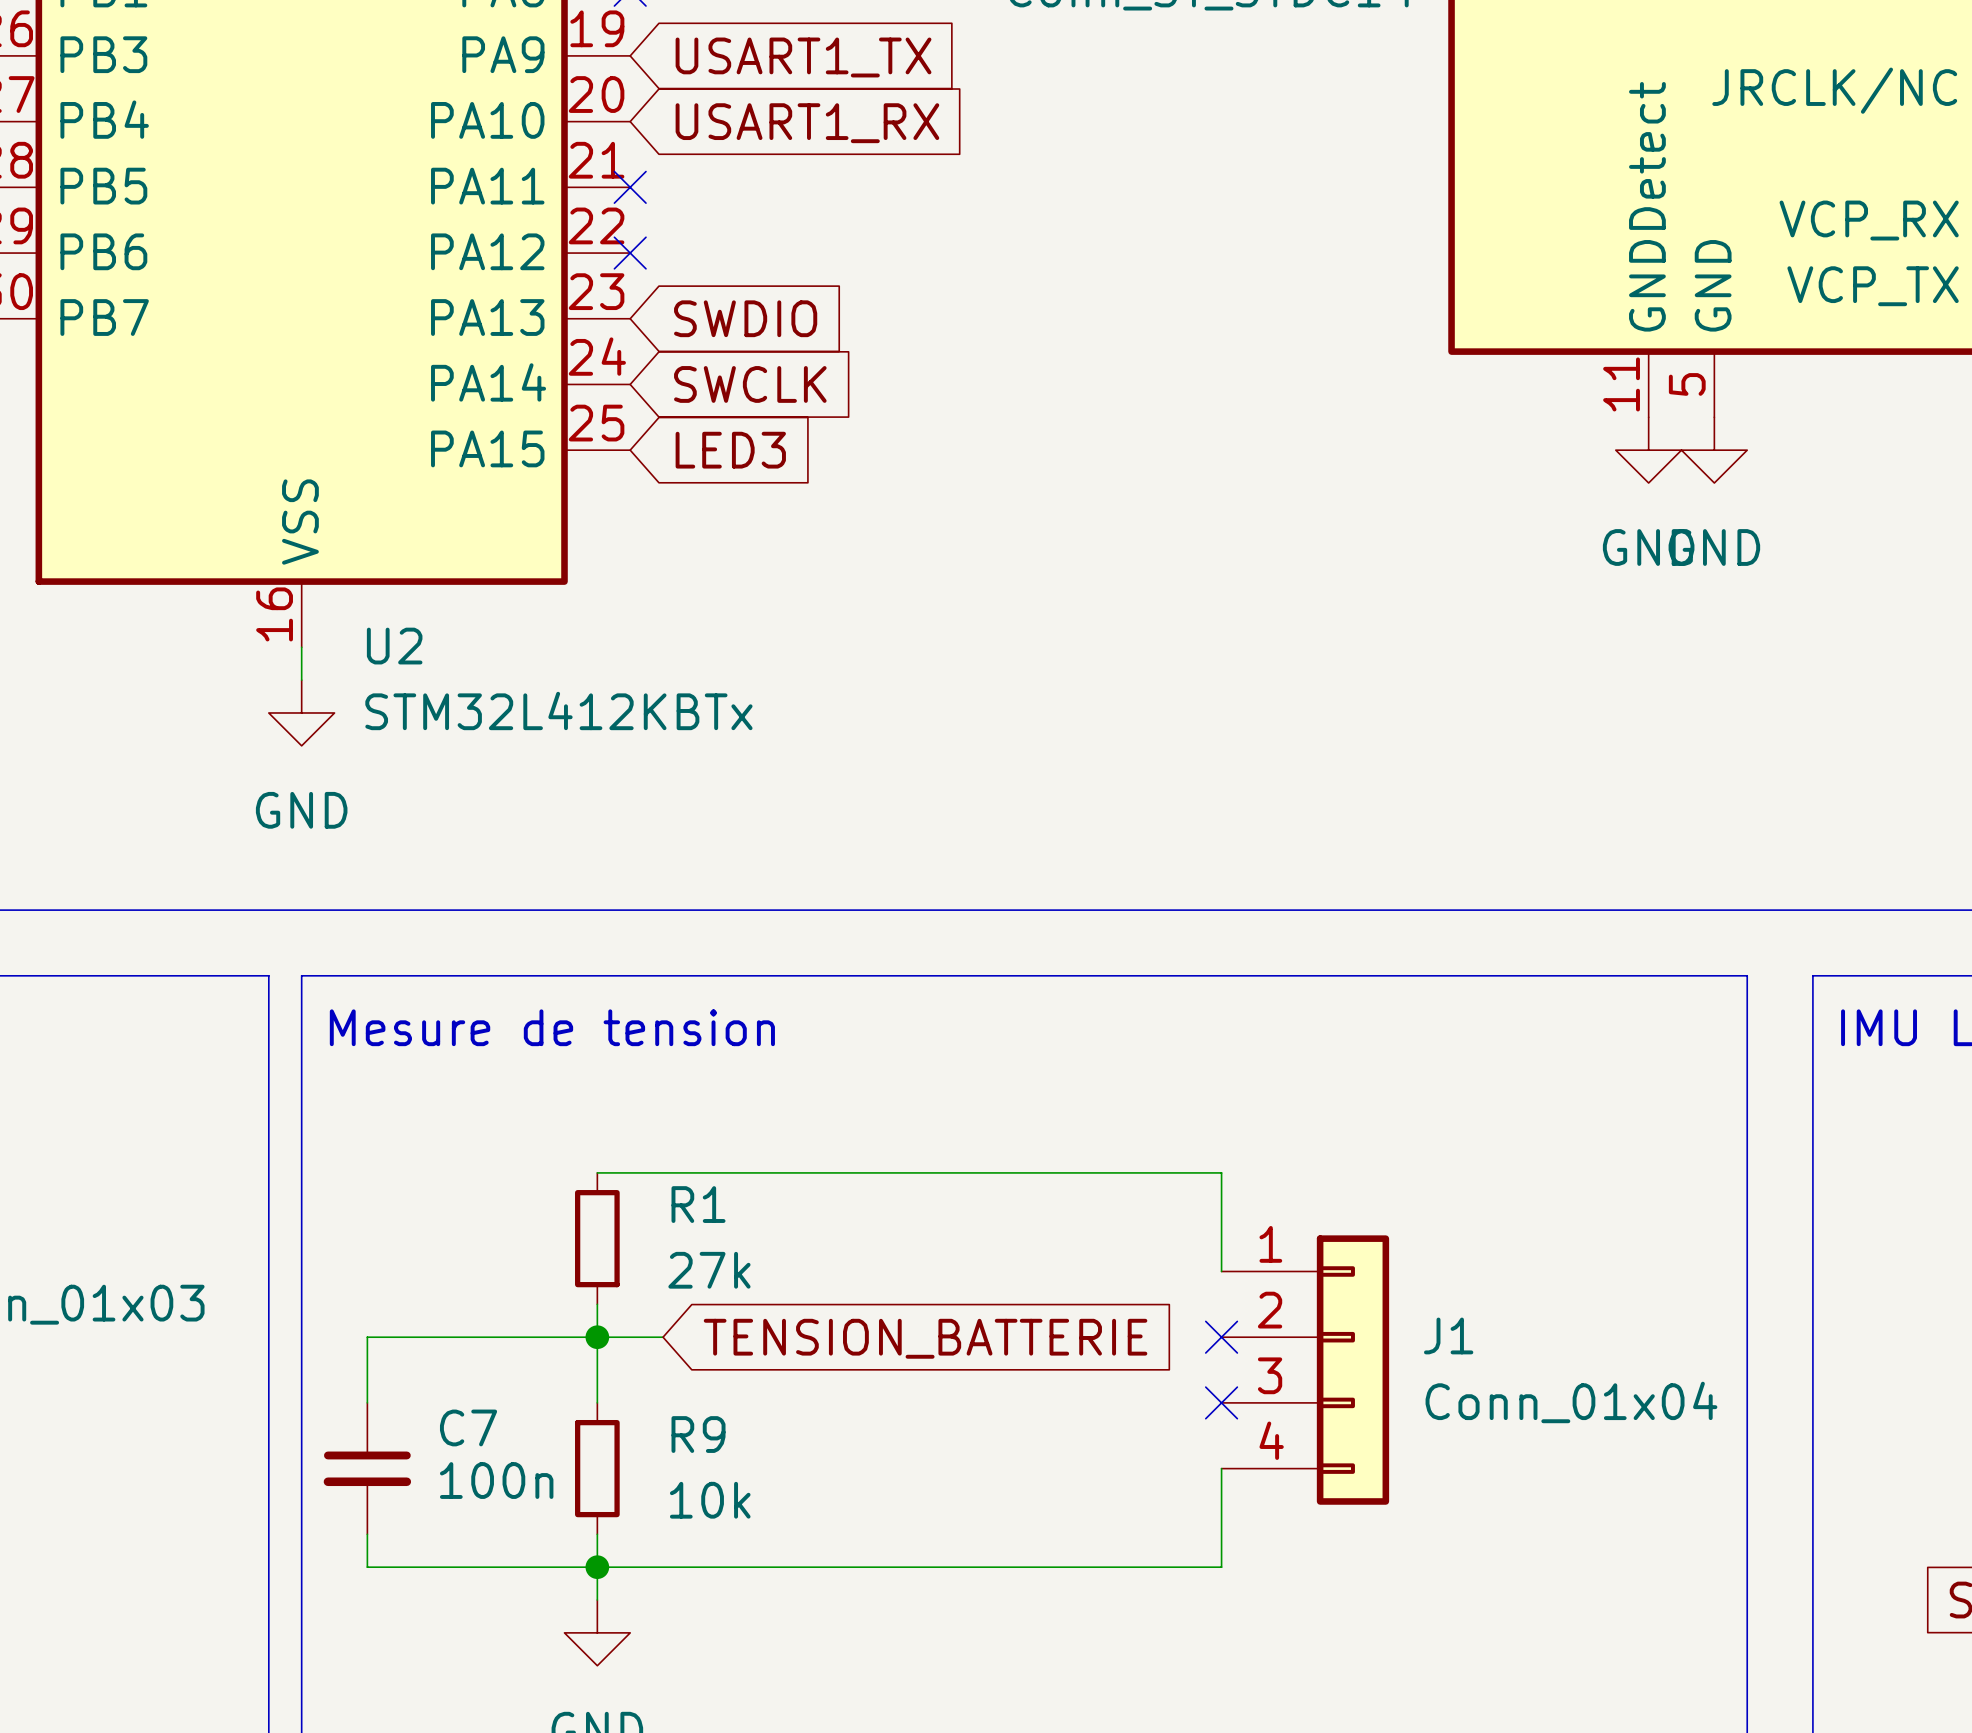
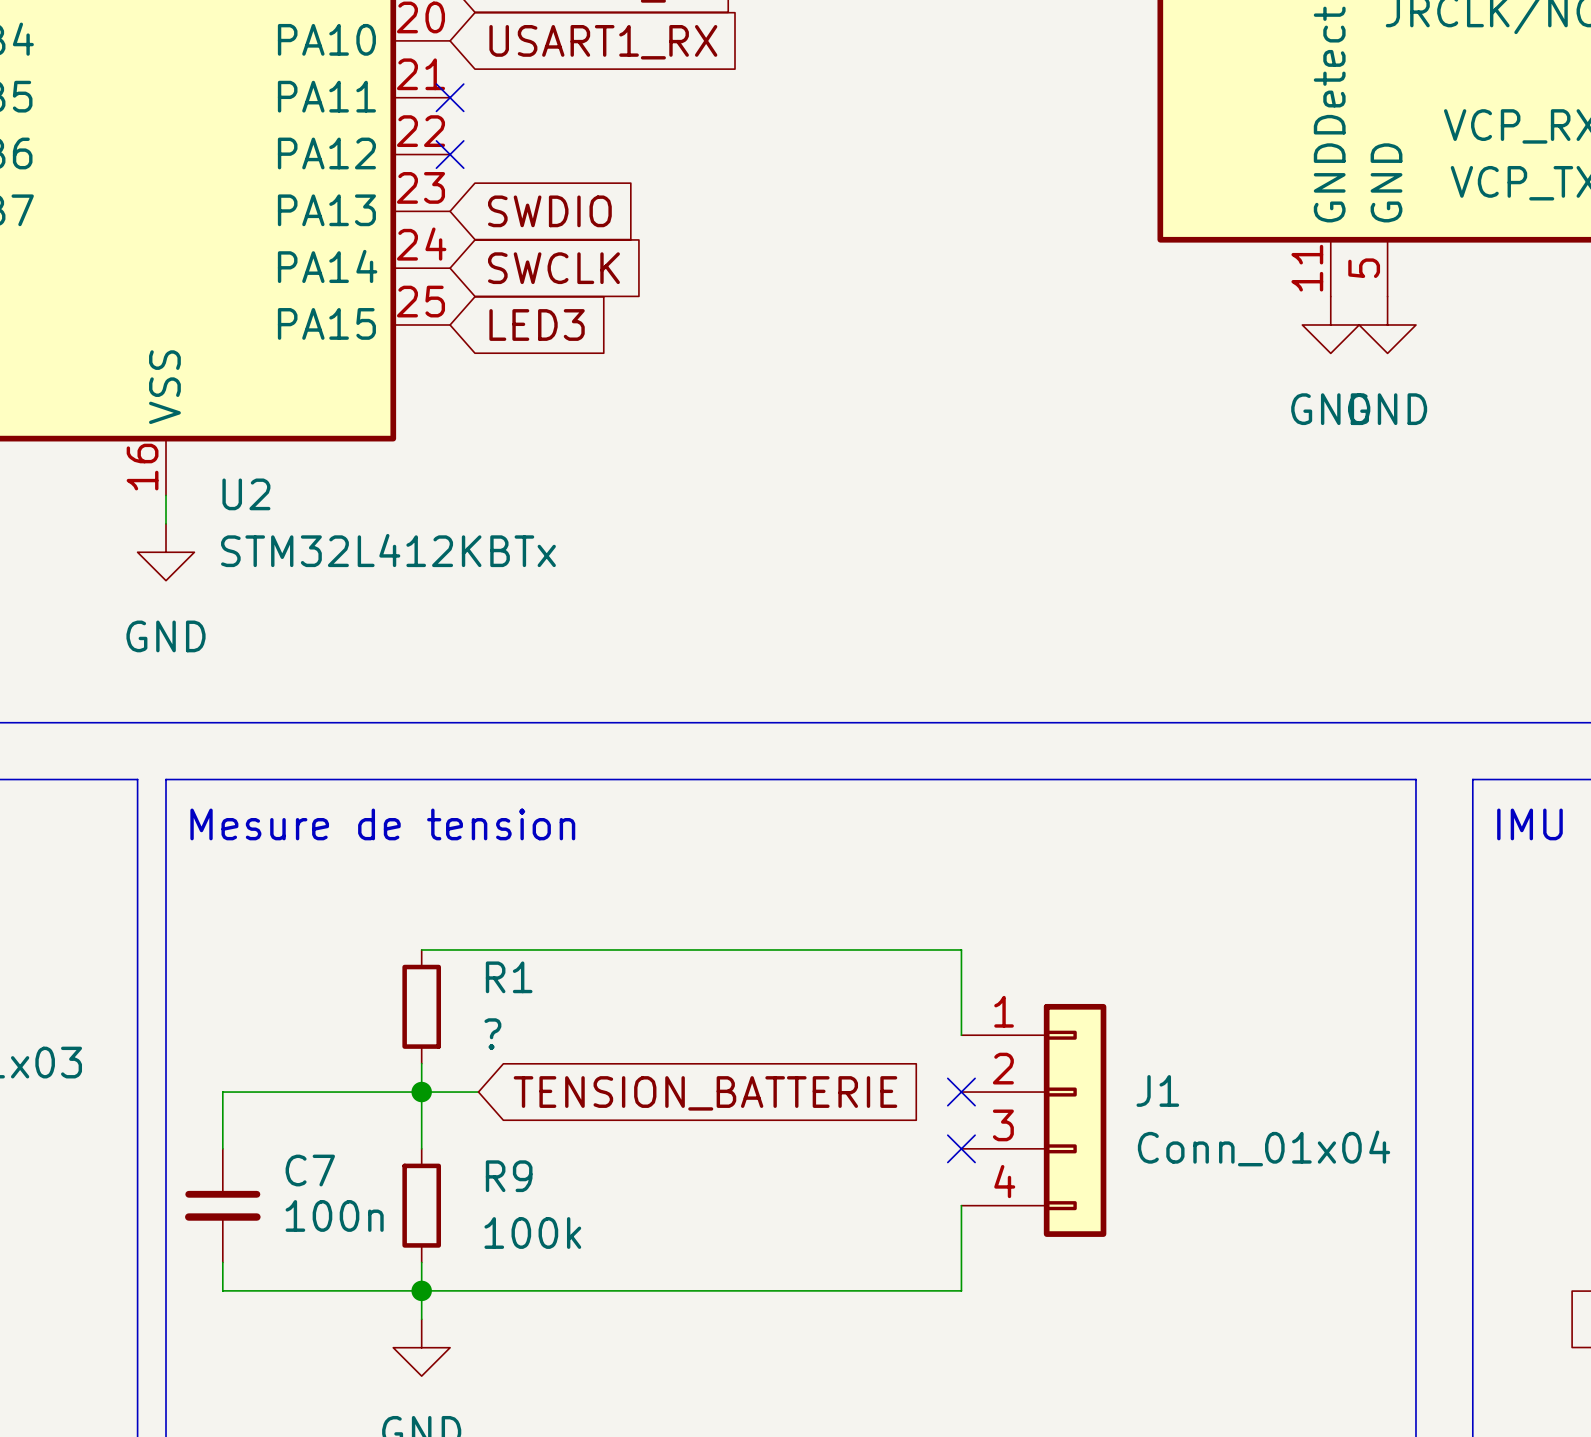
R1 value: 27k (709, 1270) -> ? (492, 1034)
R9 value: 10k (710, 1500) -> 100k (532, 1233)

